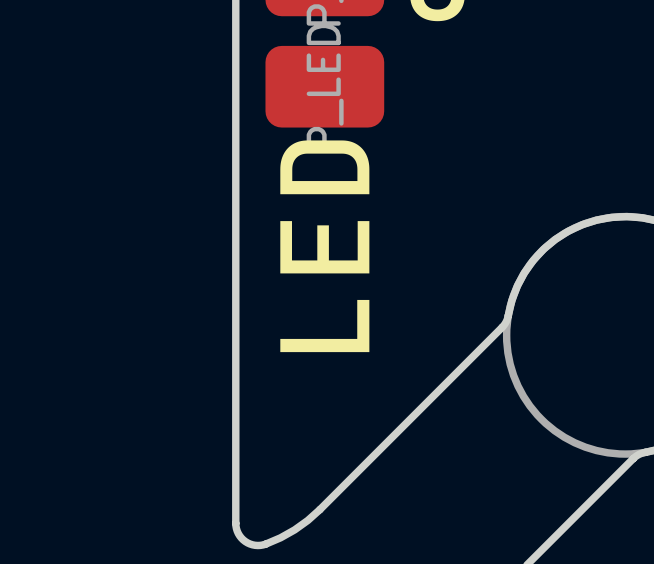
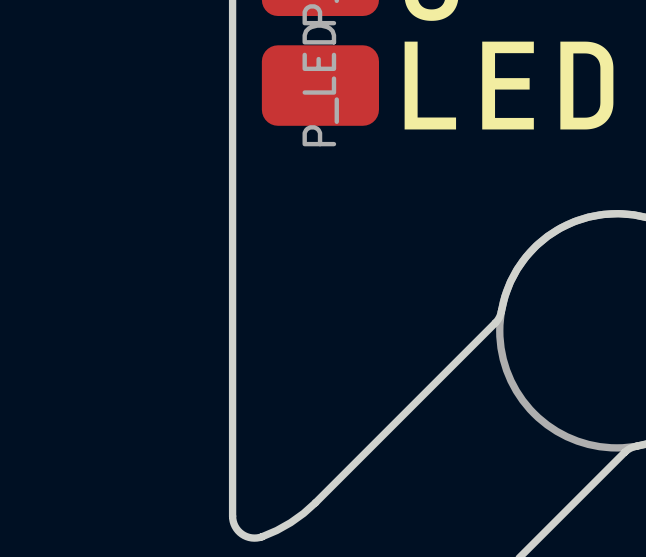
drawing: none -> [404, 41, 614, 130]
drawing: [280, 140, 370, 353] -> none

